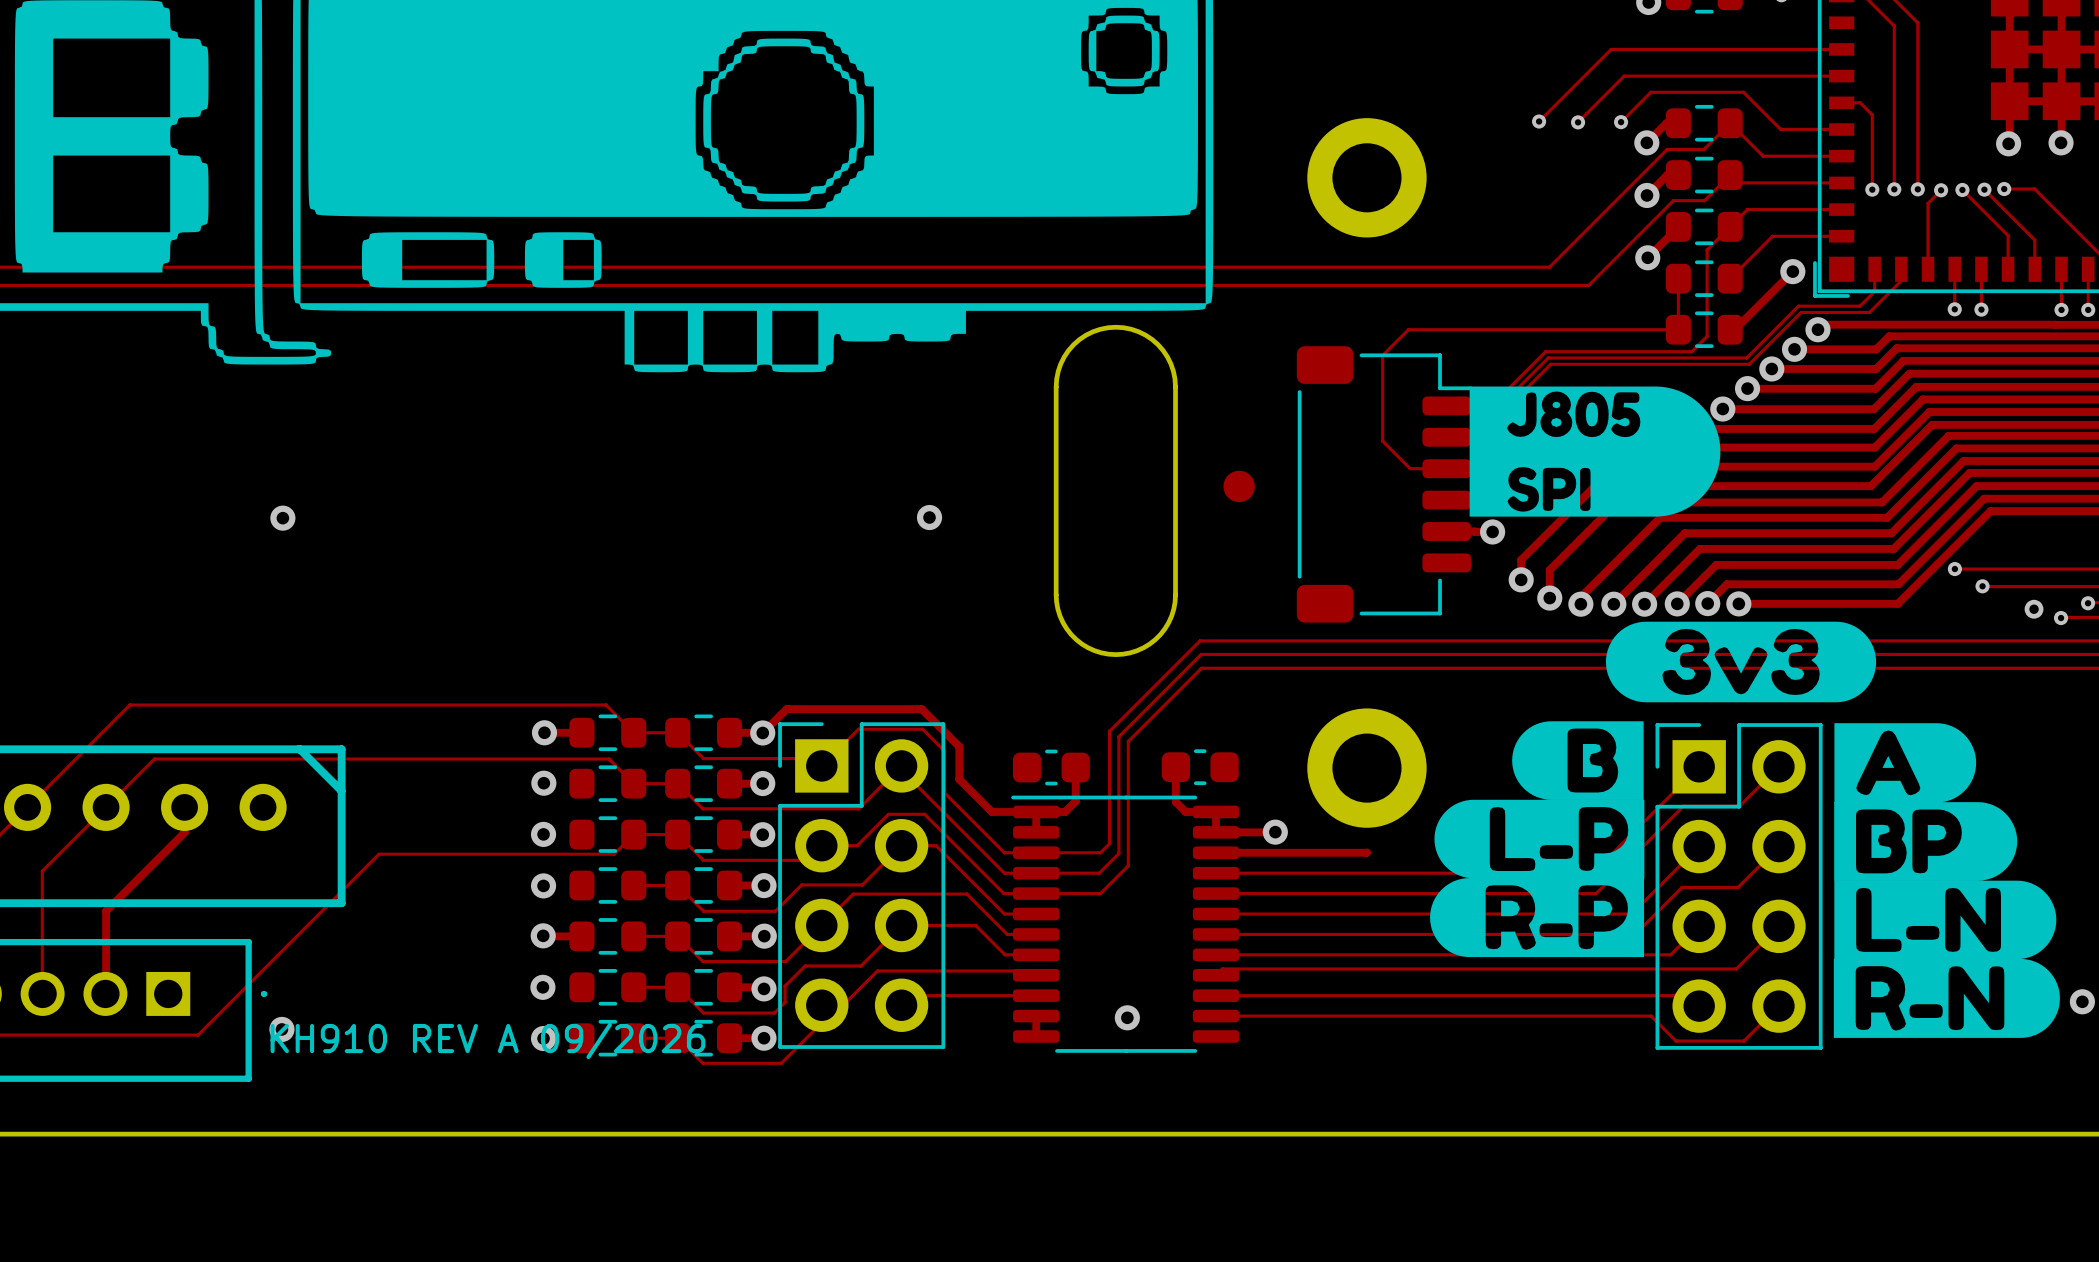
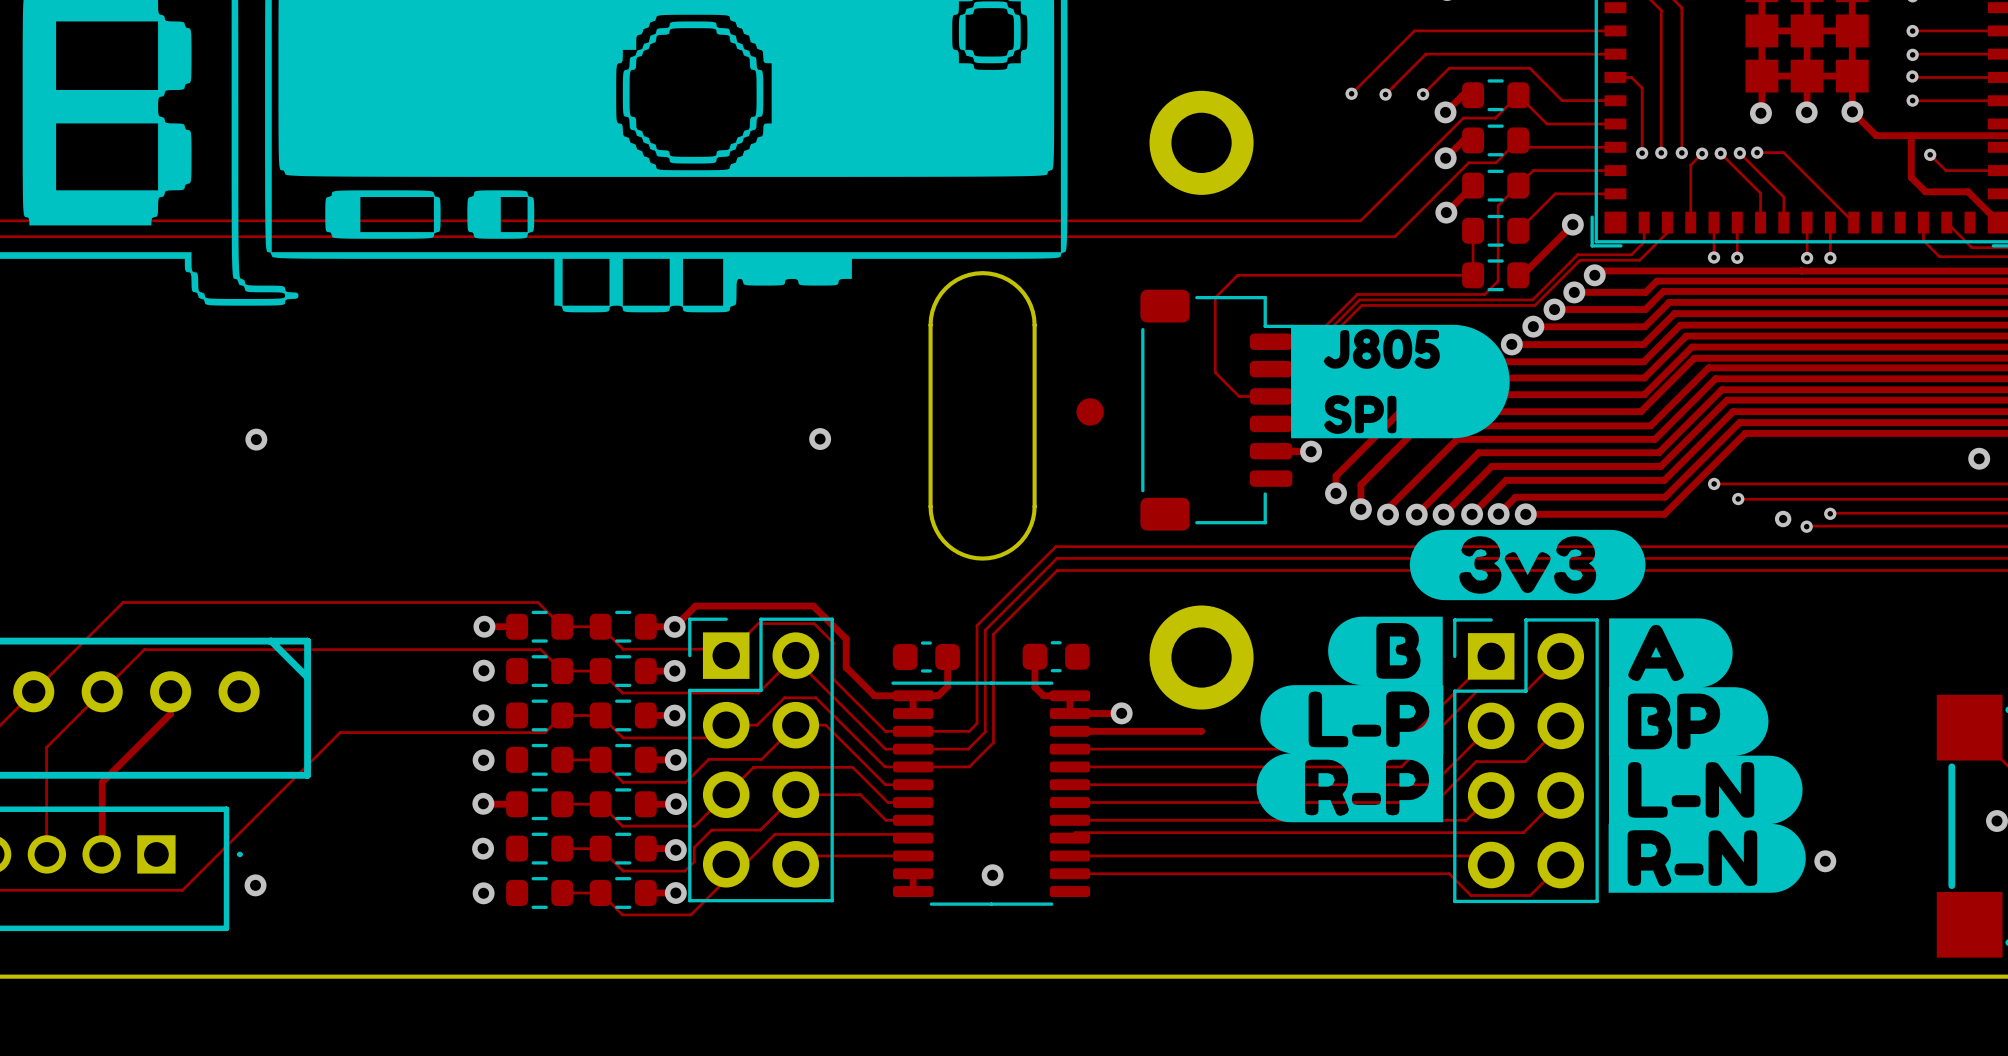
text: KH910 REV A 09/2026 (487, 1040) -> none

